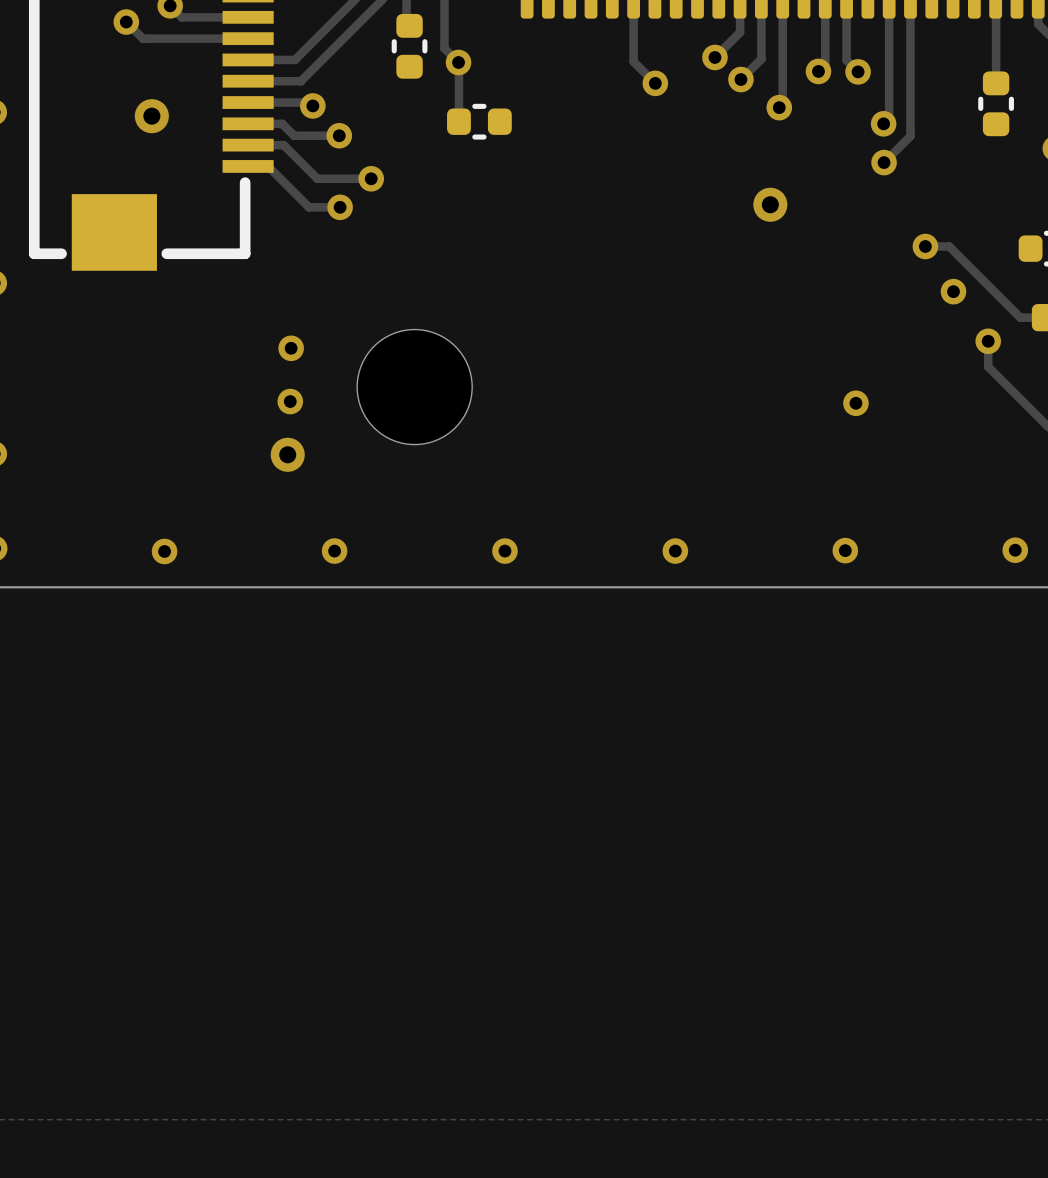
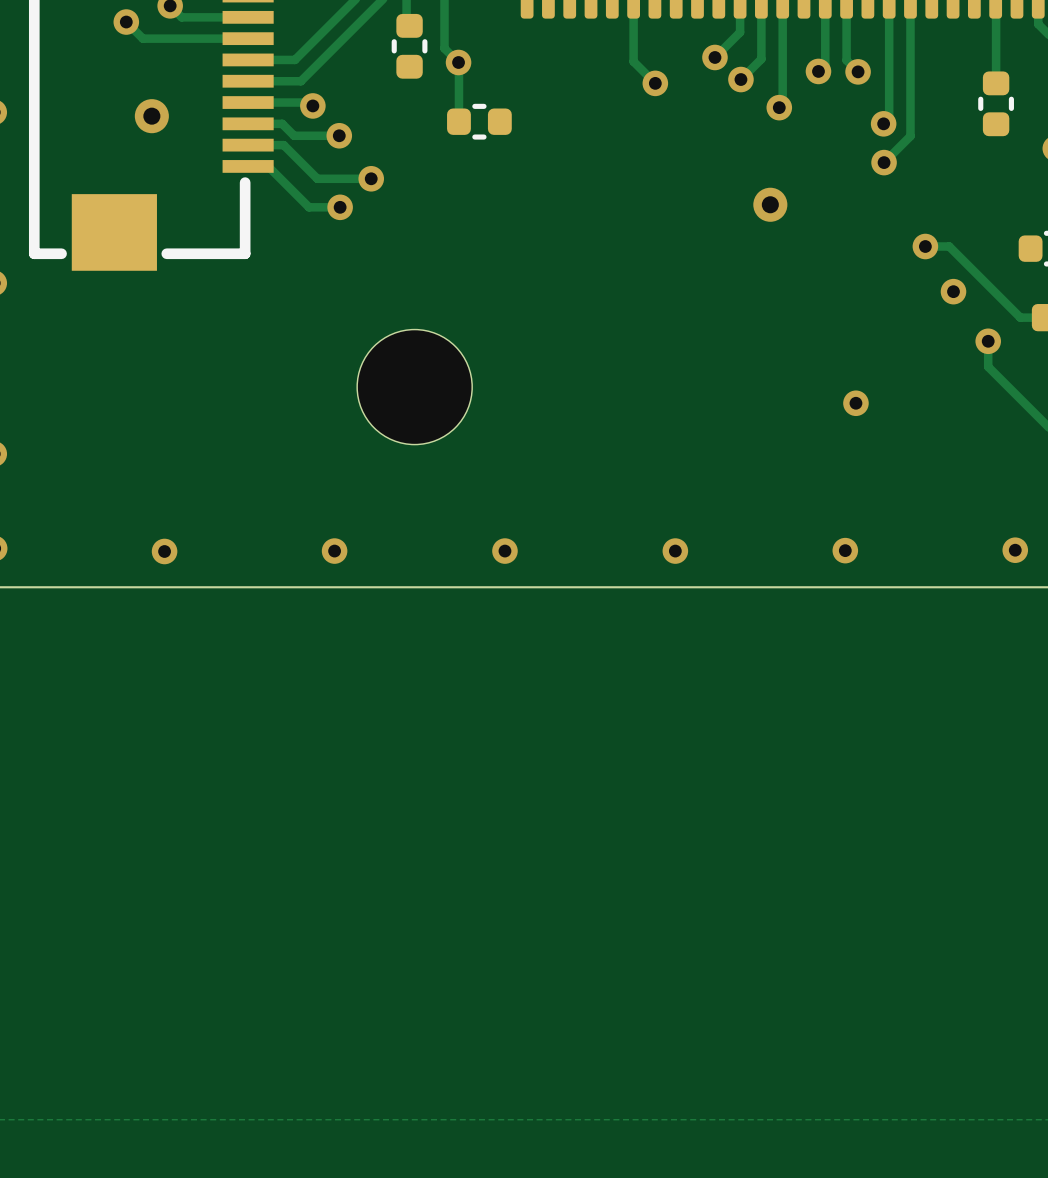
via: (291, 348) -> none
via: (290, 401) -> none
via: (287, 454) -> none

